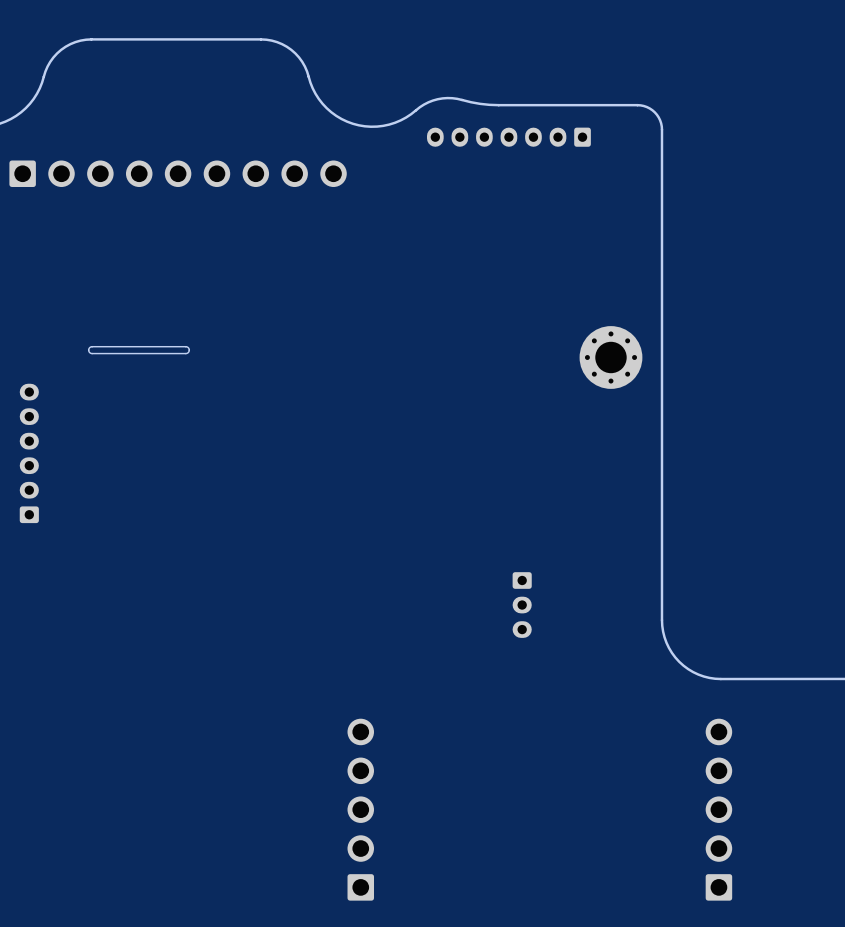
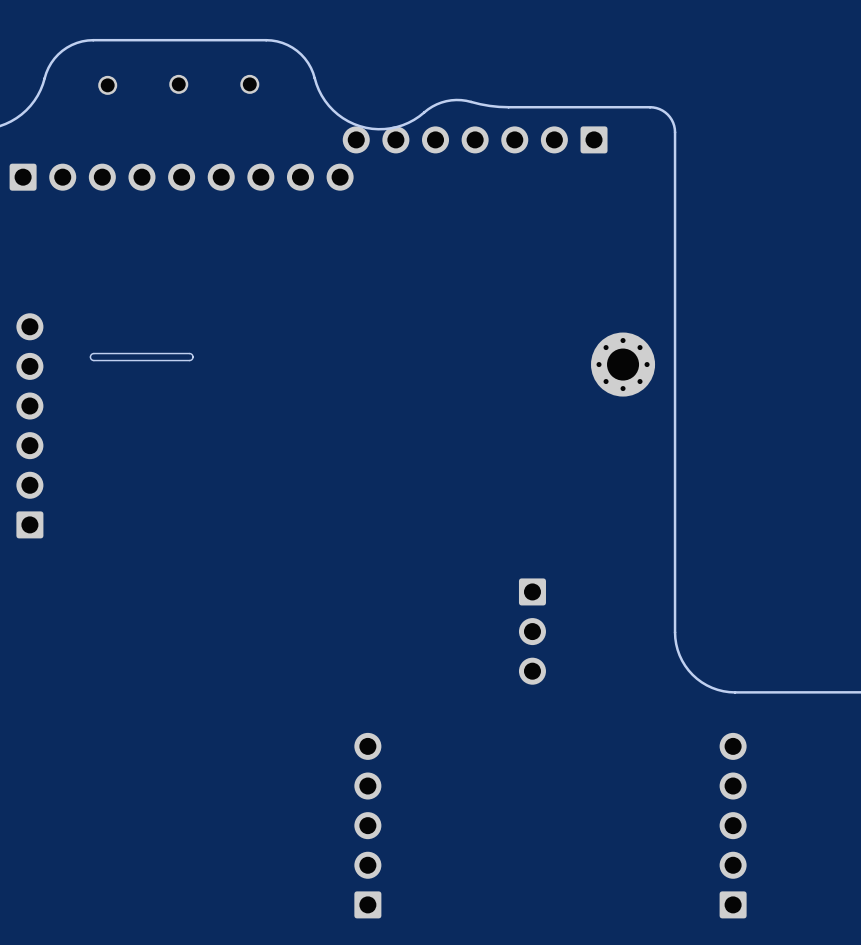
part: none -> (178, 84)
part: none -> (249, 84)
part: none -> (107, 85)
part: none -> (475, 139)
part: (508, 137) -> none
part: none -> (29, 425)
part: (29, 453) -> none
part: (522, 605) -> none
part: none -> (532, 631)

